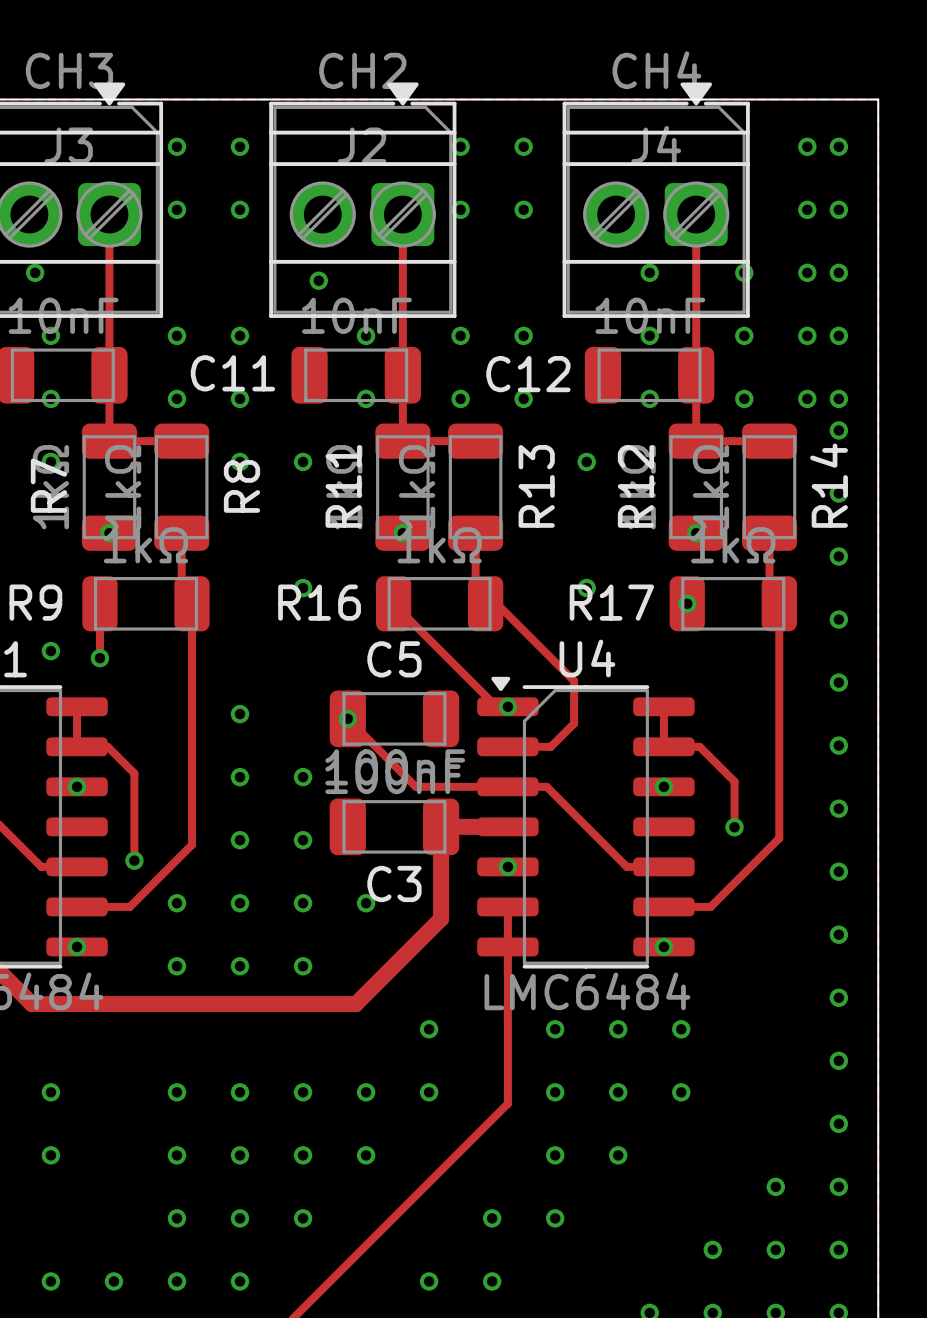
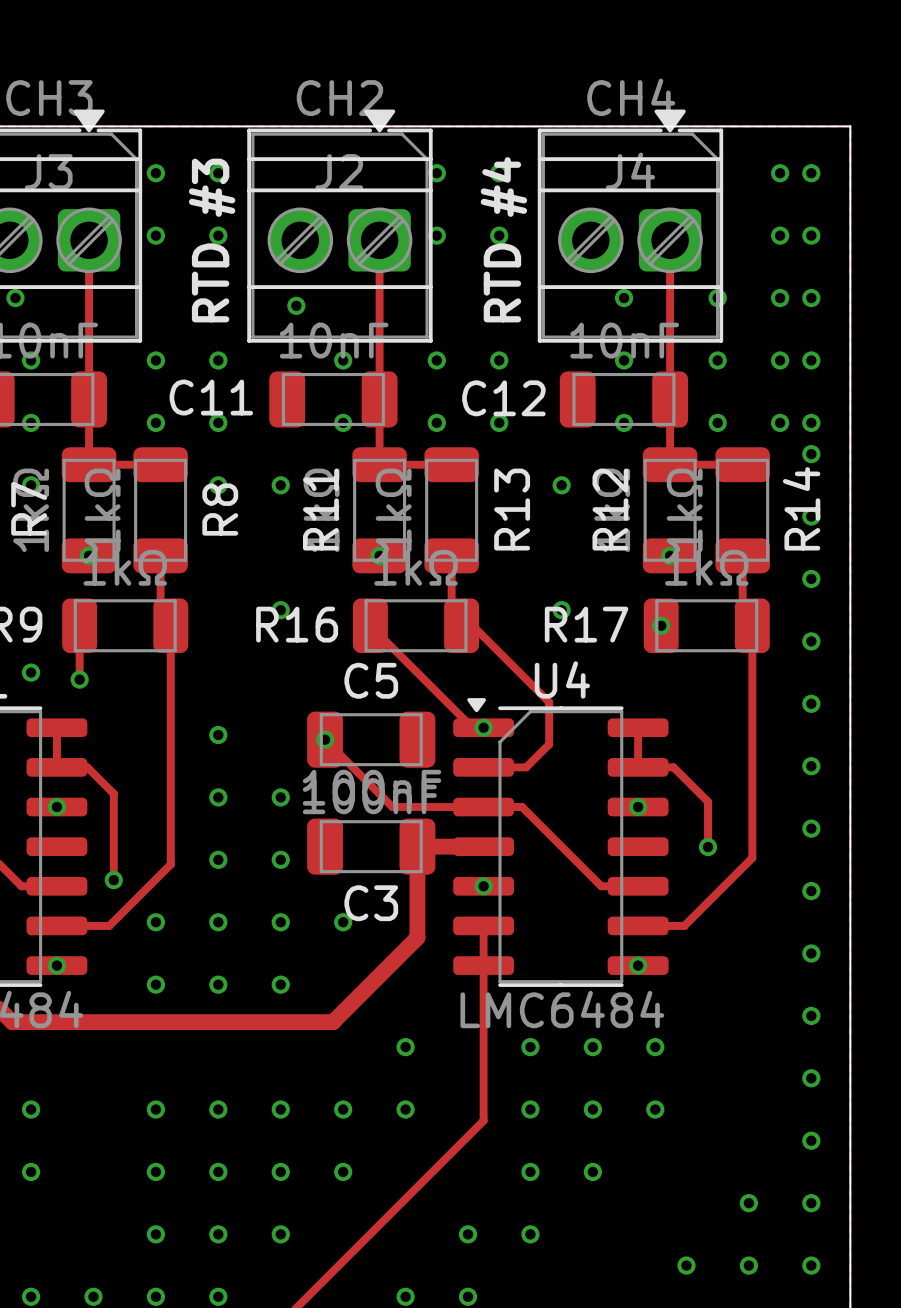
text: none -> RTD #3 (212, 240)
text: none -> RTD #4 (503, 239)

